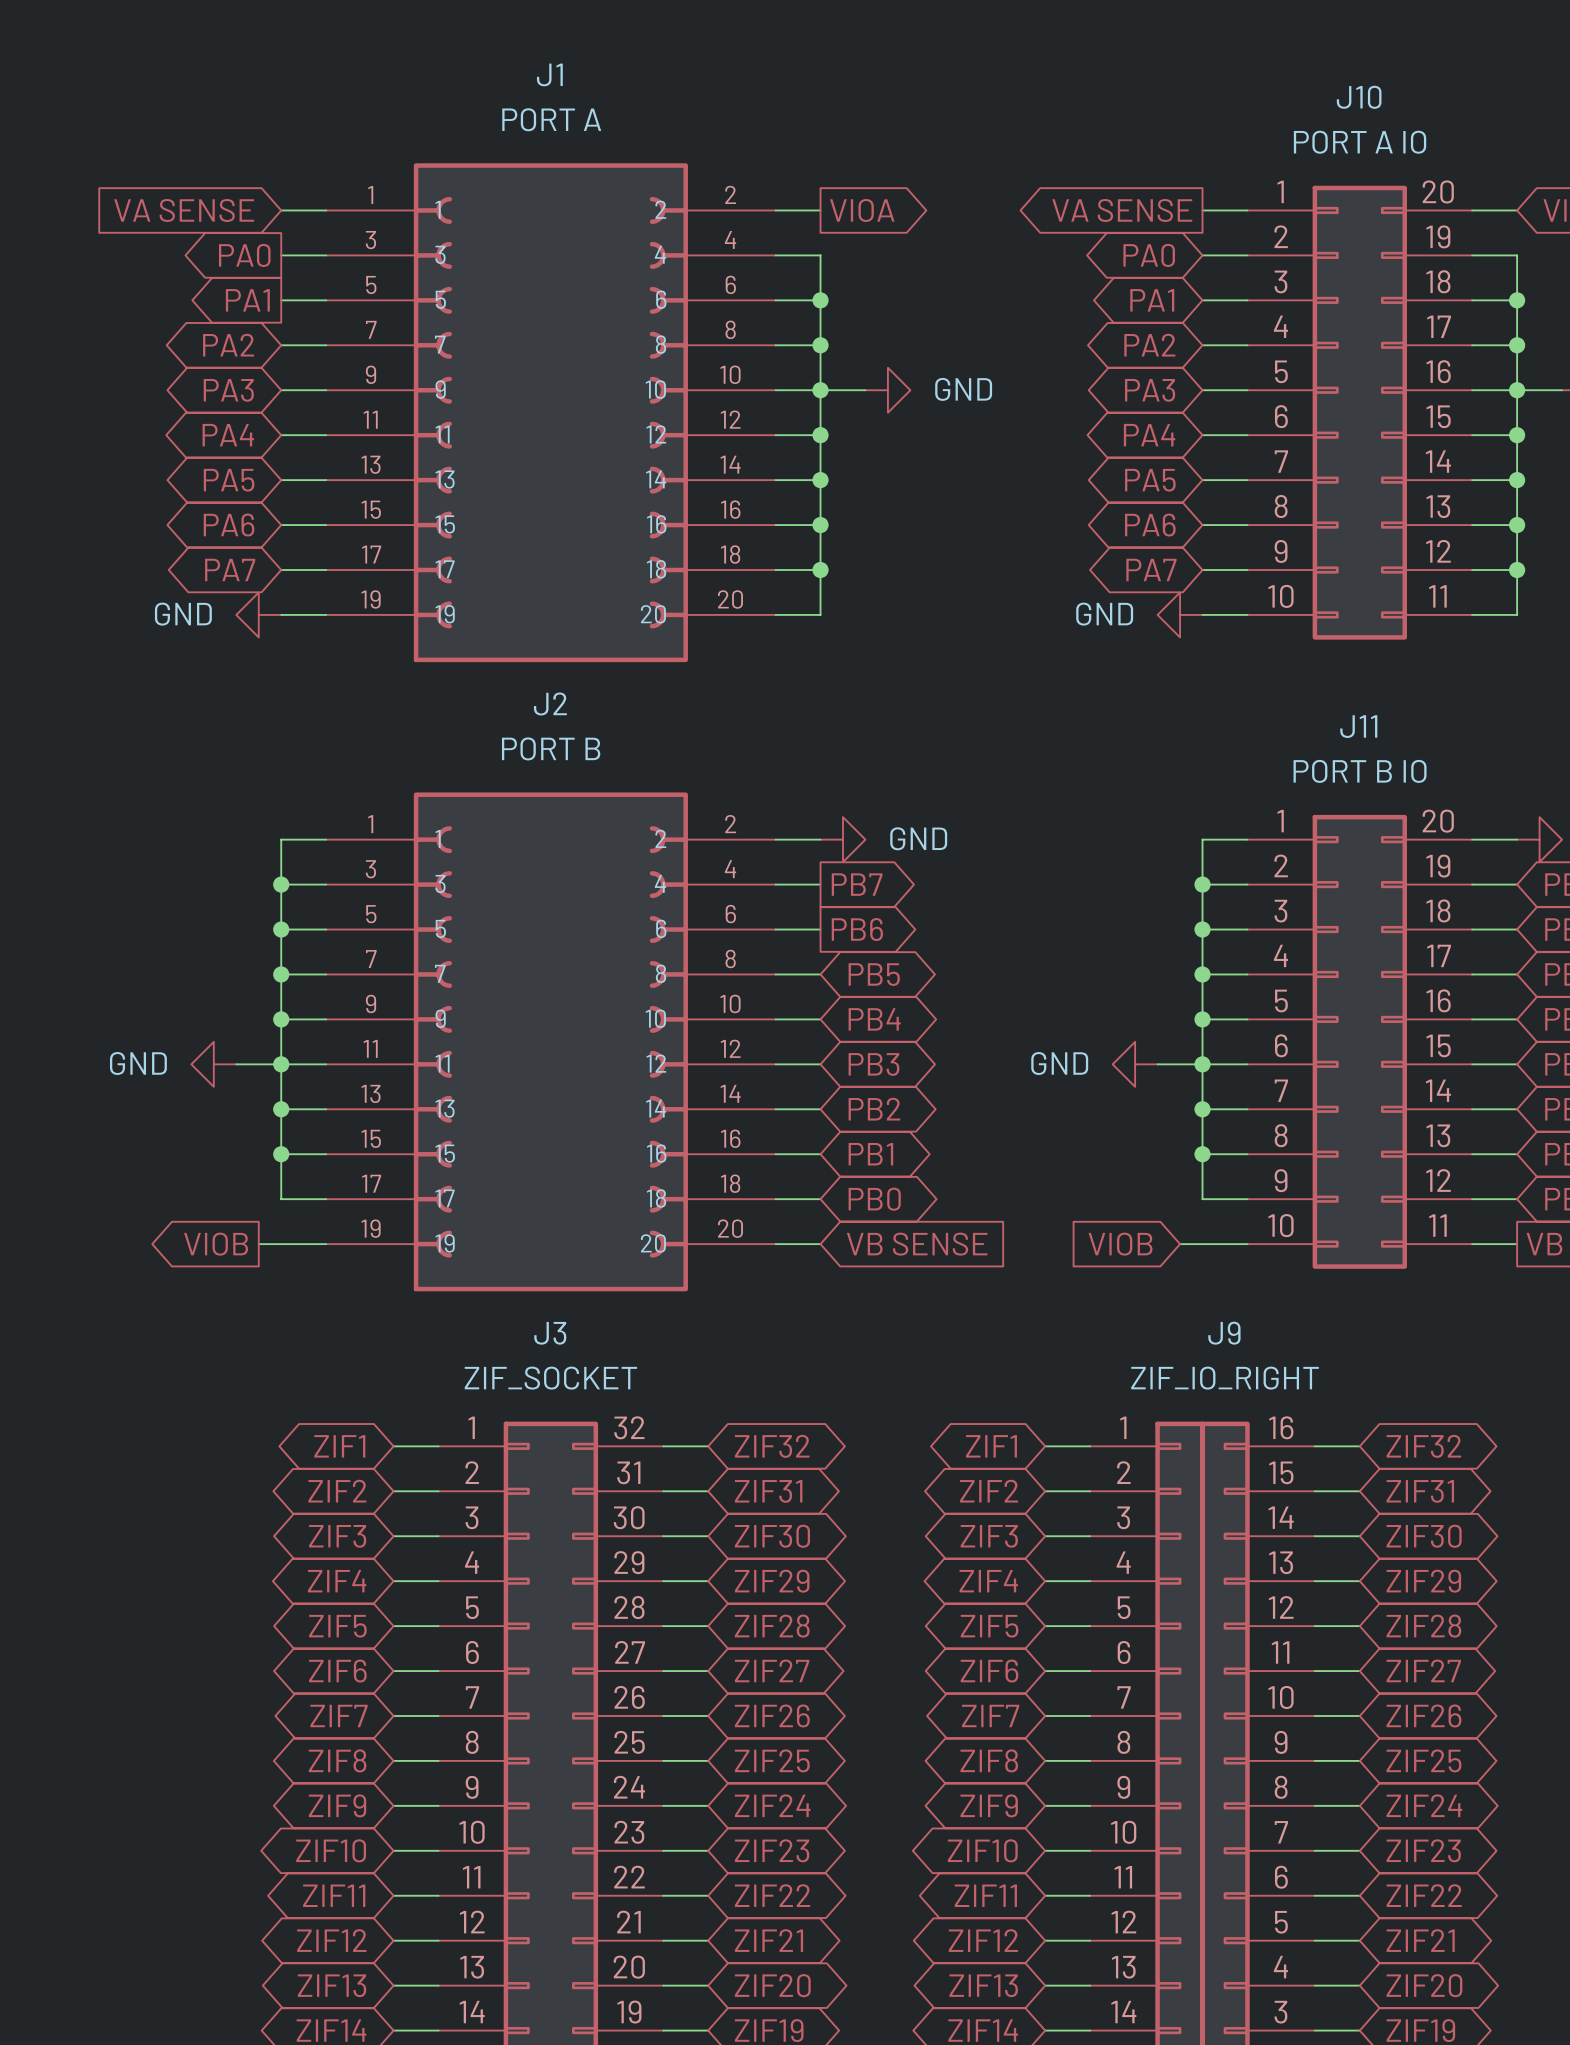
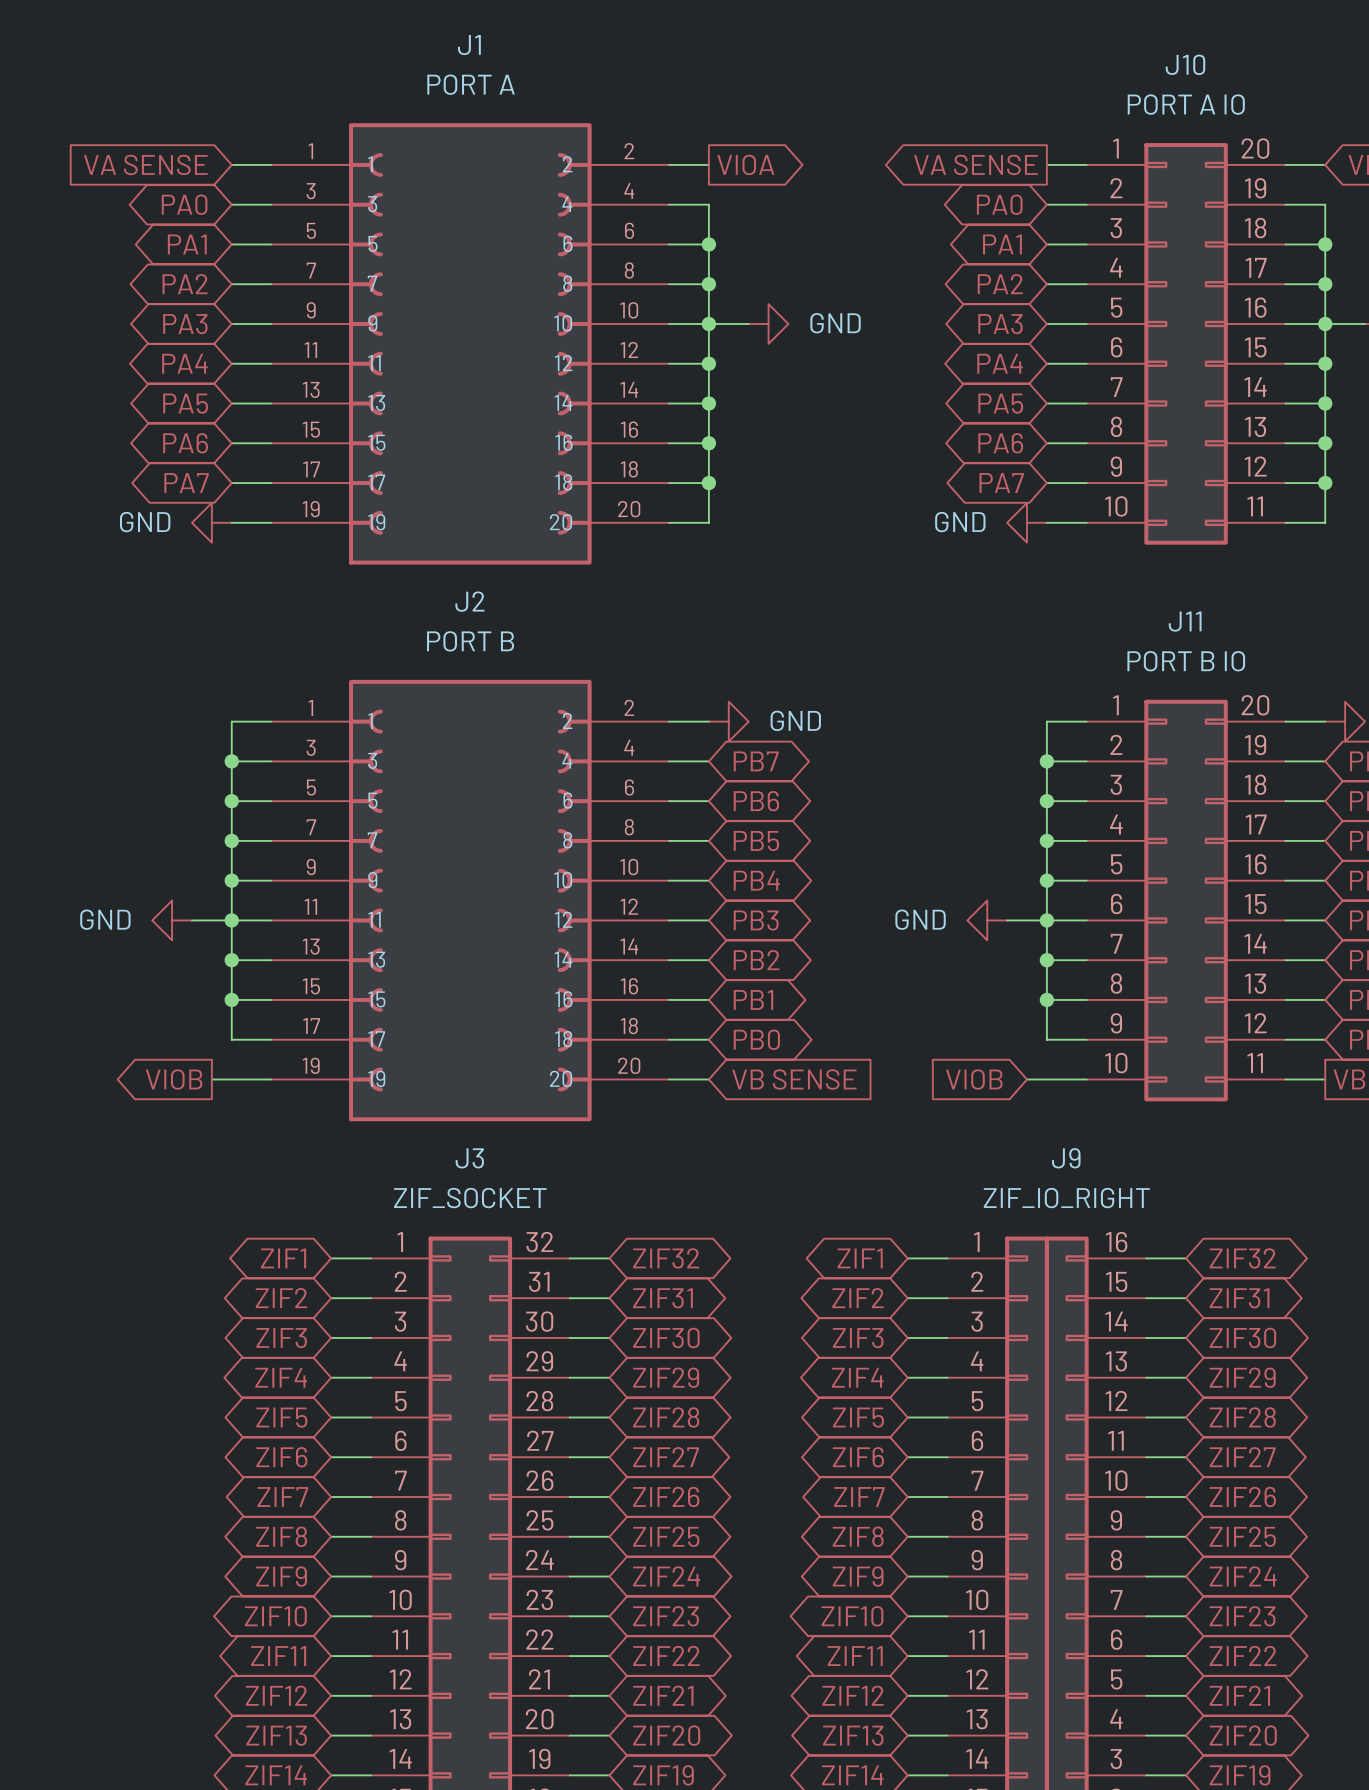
global label shape: output (244, 255) -> bidirectional (184, 204)
global label shape: output (247, 300) -> bidirectional (187, 244)
global label shape: output (857, 884) -> bidirectional (756, 761)
global label shape: output (857, 929) -> bidirectional (756, 801)

